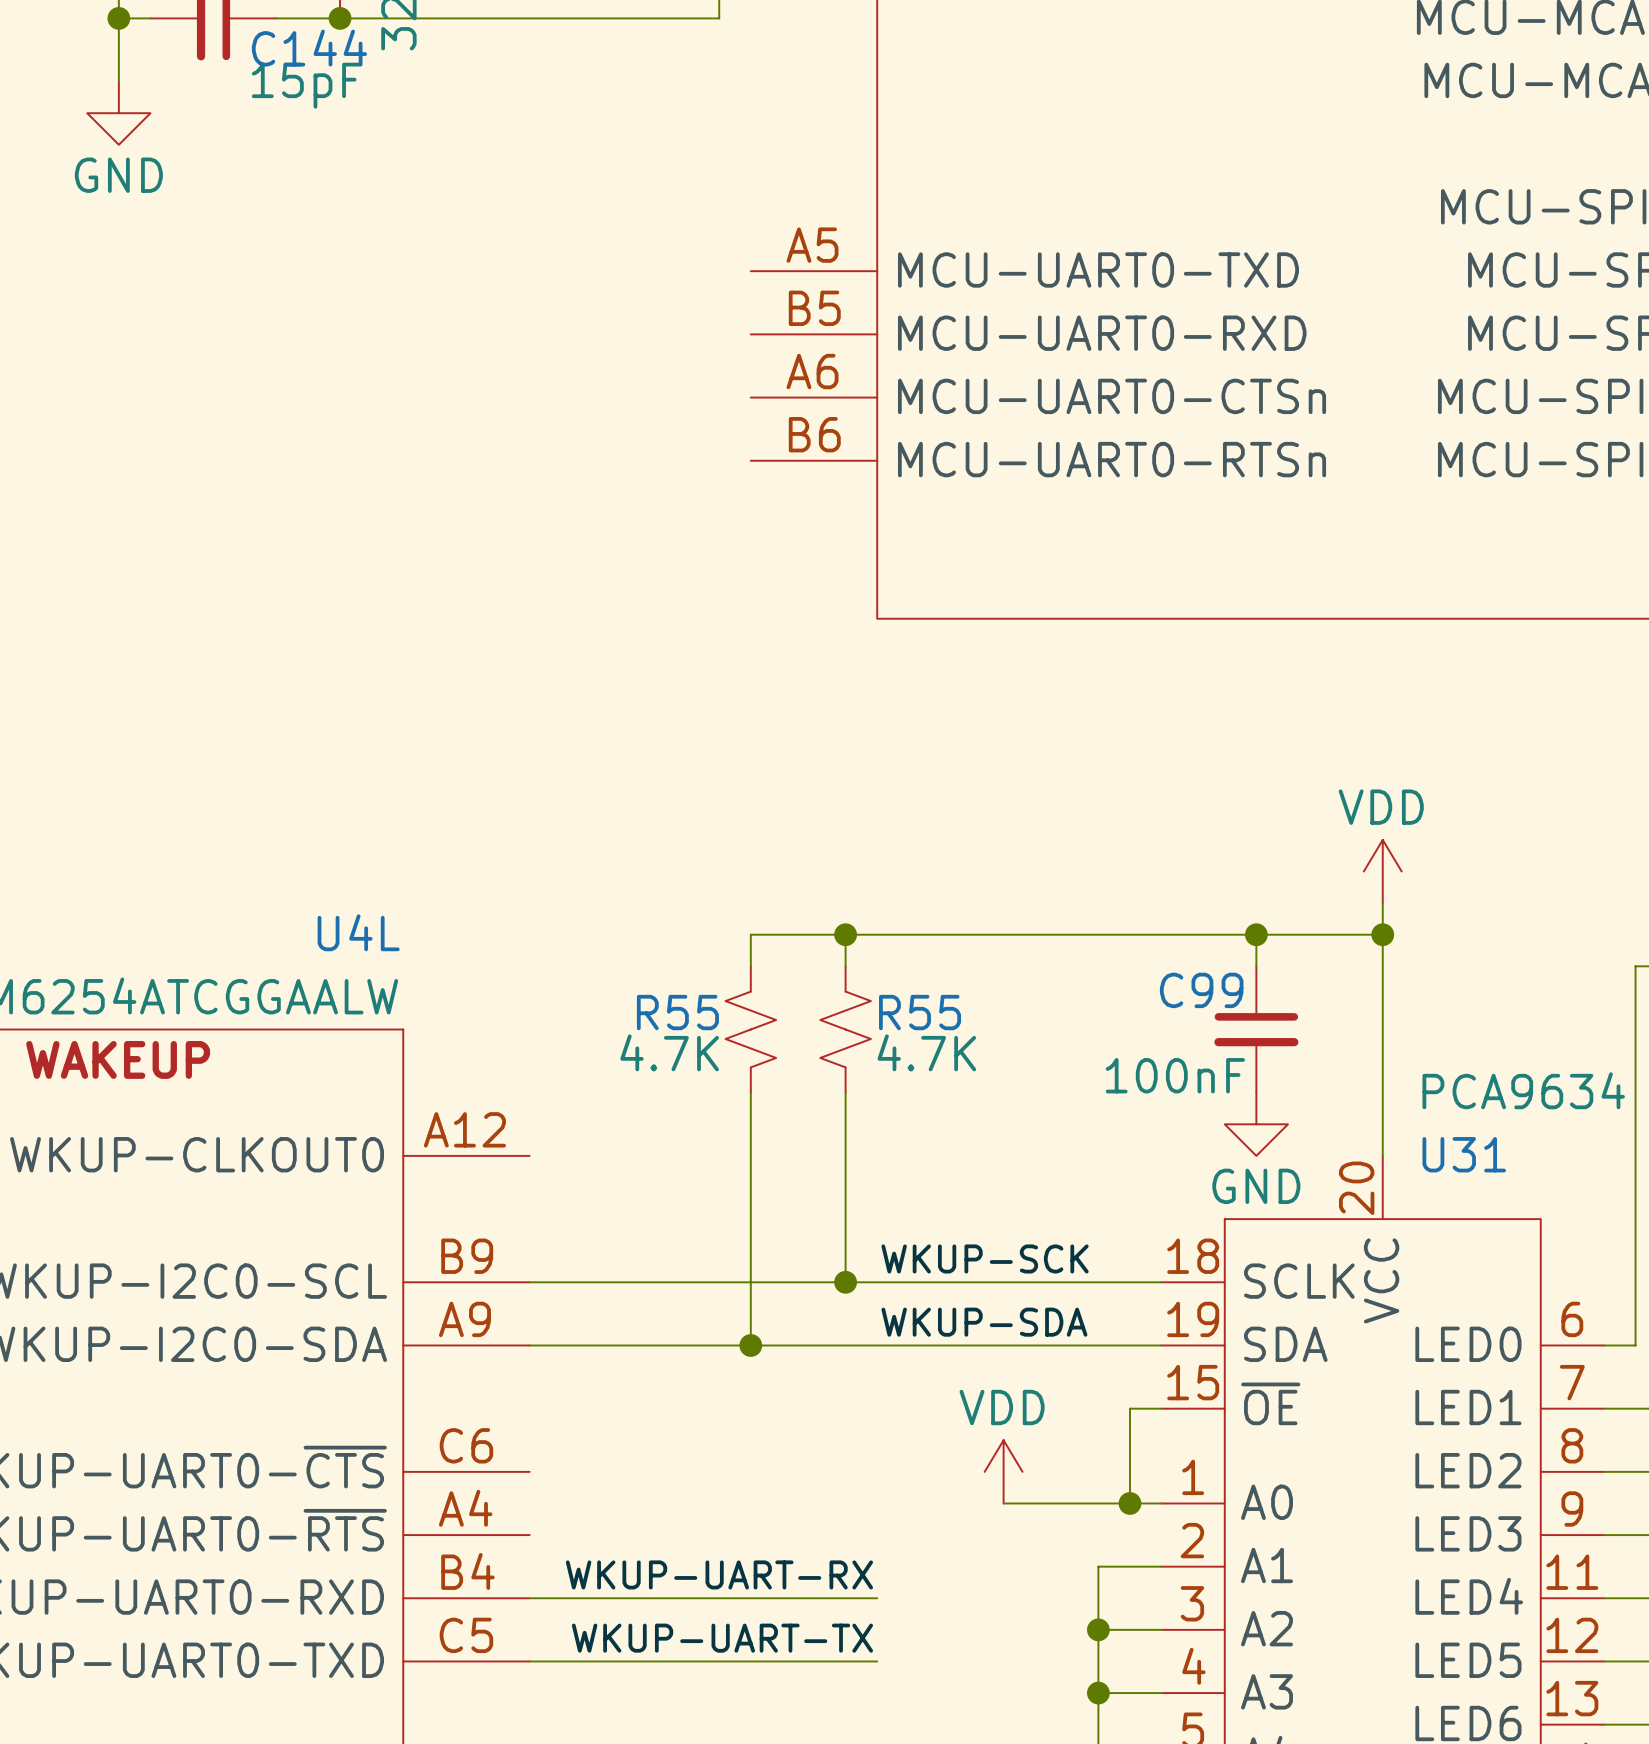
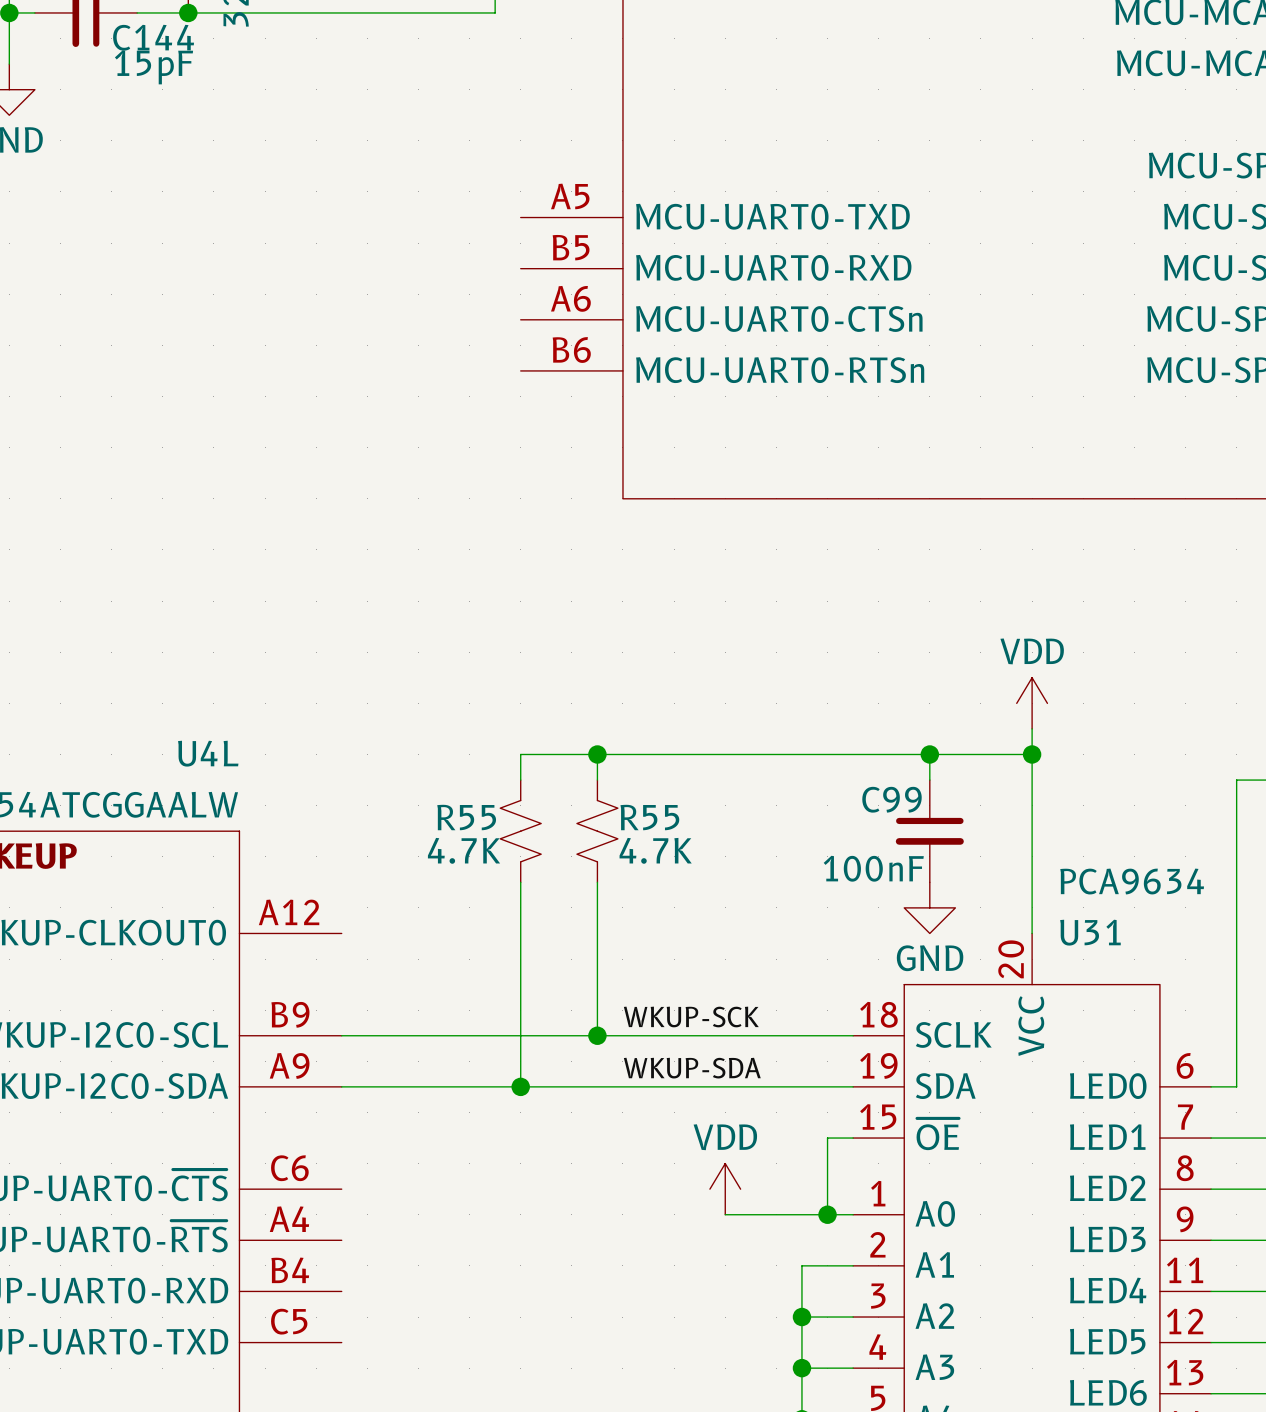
label: WKUP-UART-RX (719, 1574) -> none
wire: (529, 1598) (877, 1598) -> none
label: WKUP-UART-TX (722, 1638) -> none
wire: (529, 1661) (877, 1661) -> none

